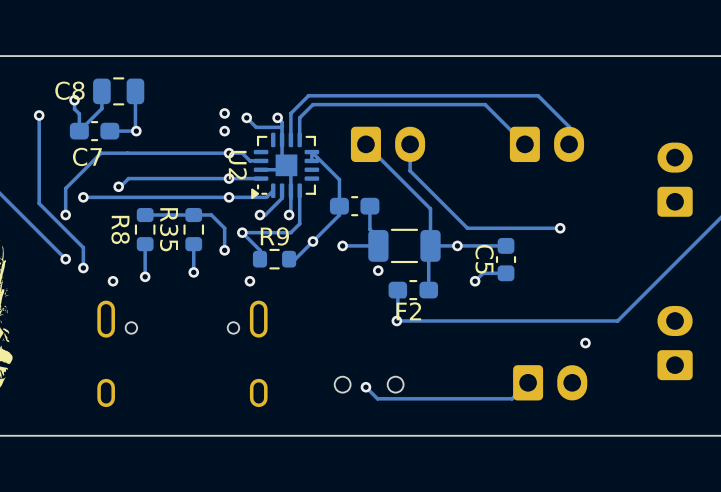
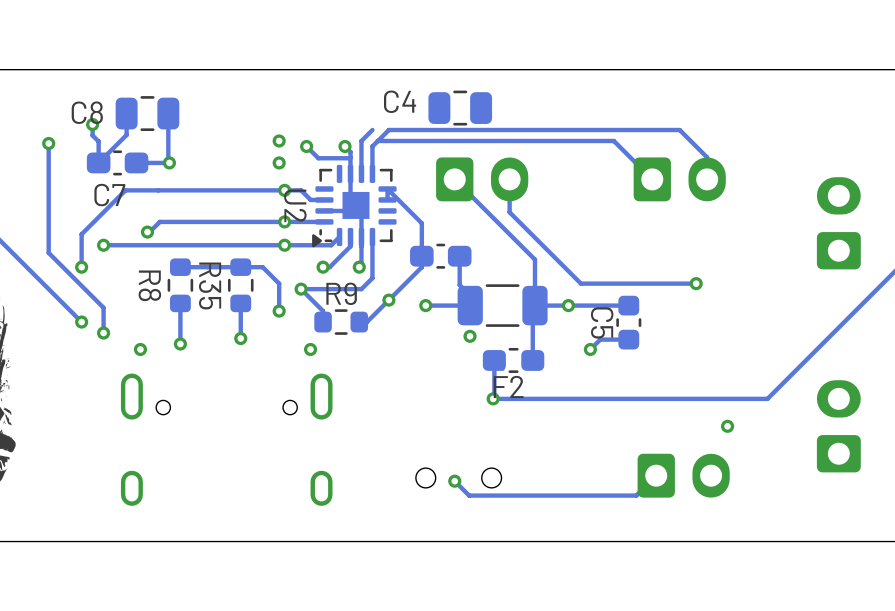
C4: none -> (460, 108)
track: (485, 104) (494, 113) -> (602, 130) (679, 130)
track: (546, 104) (538, 95) (308, 95) (299, 104) -> none
track: none -> (613, 140) (377, 140)

